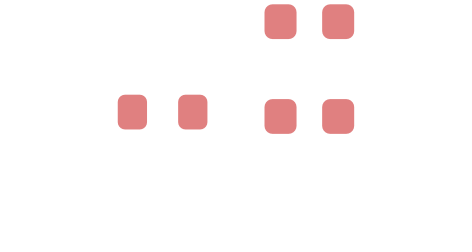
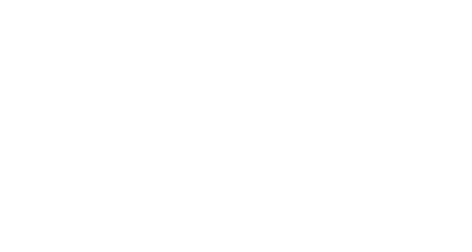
part: (309, 21) -> none
part: (162, 112) -> none
part: (309, 116) -> none

